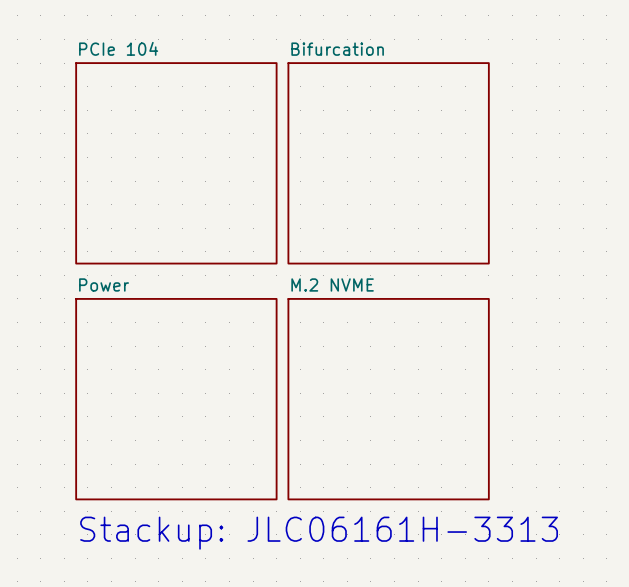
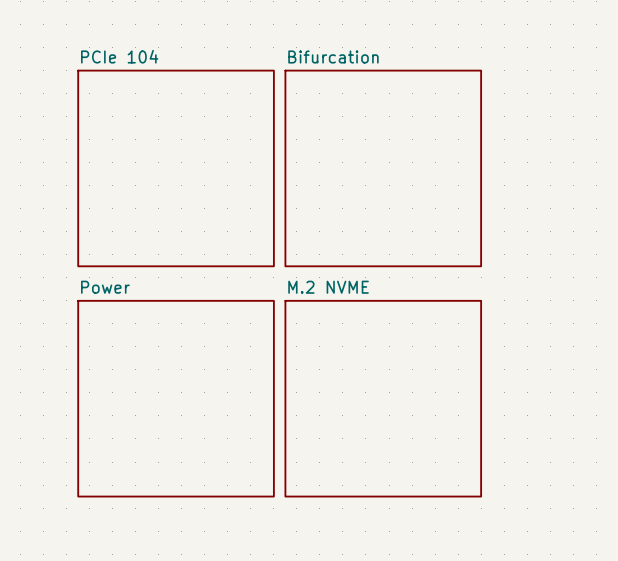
text: Stackup: JLC06161H-3313 (319, 533) -> none

